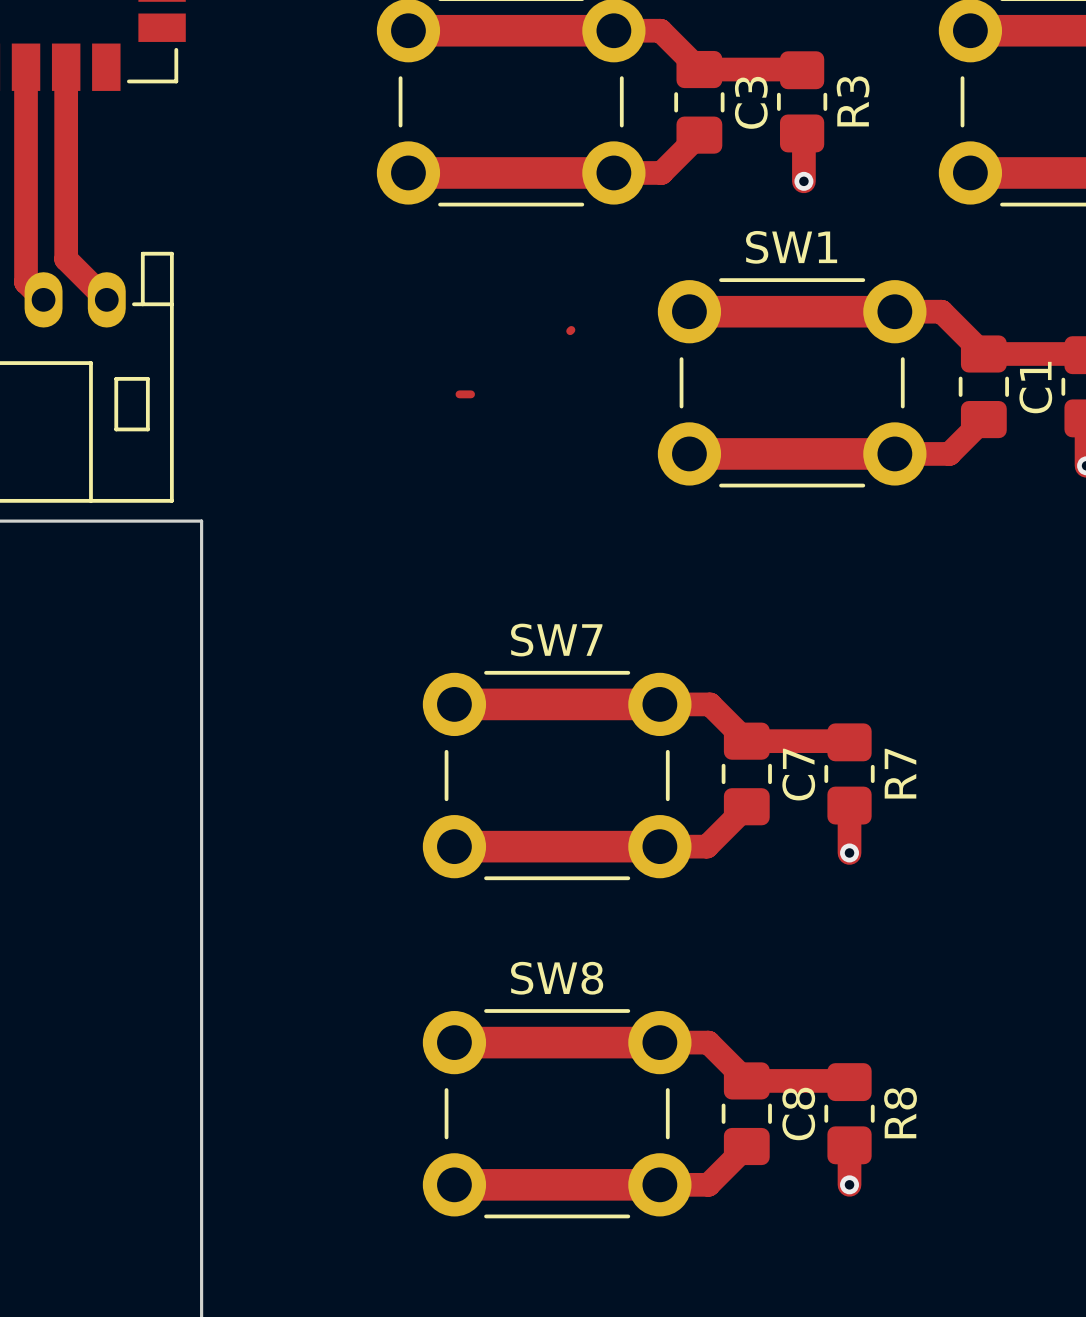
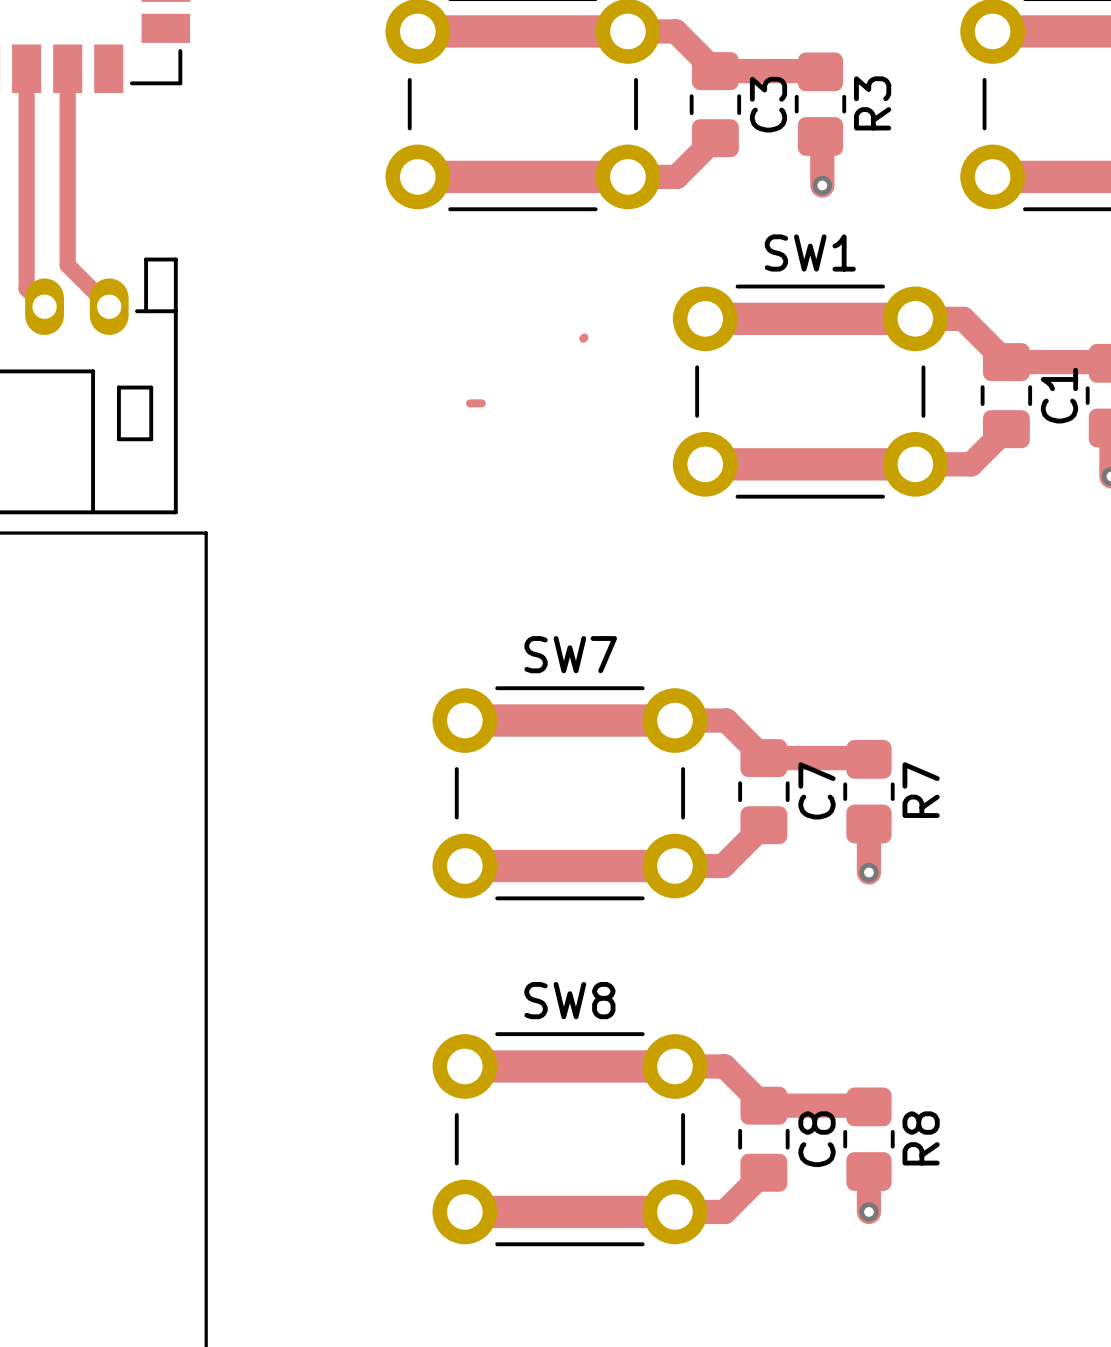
track width: thick (26, 67) (26, 282) (43, 299) -> thin (26, 68) (26, 288) (44, 306)
track width: thick (66, 67) (66, 259) (106, 299) -> thin (67, 68) (67, 265) (109, 306)

